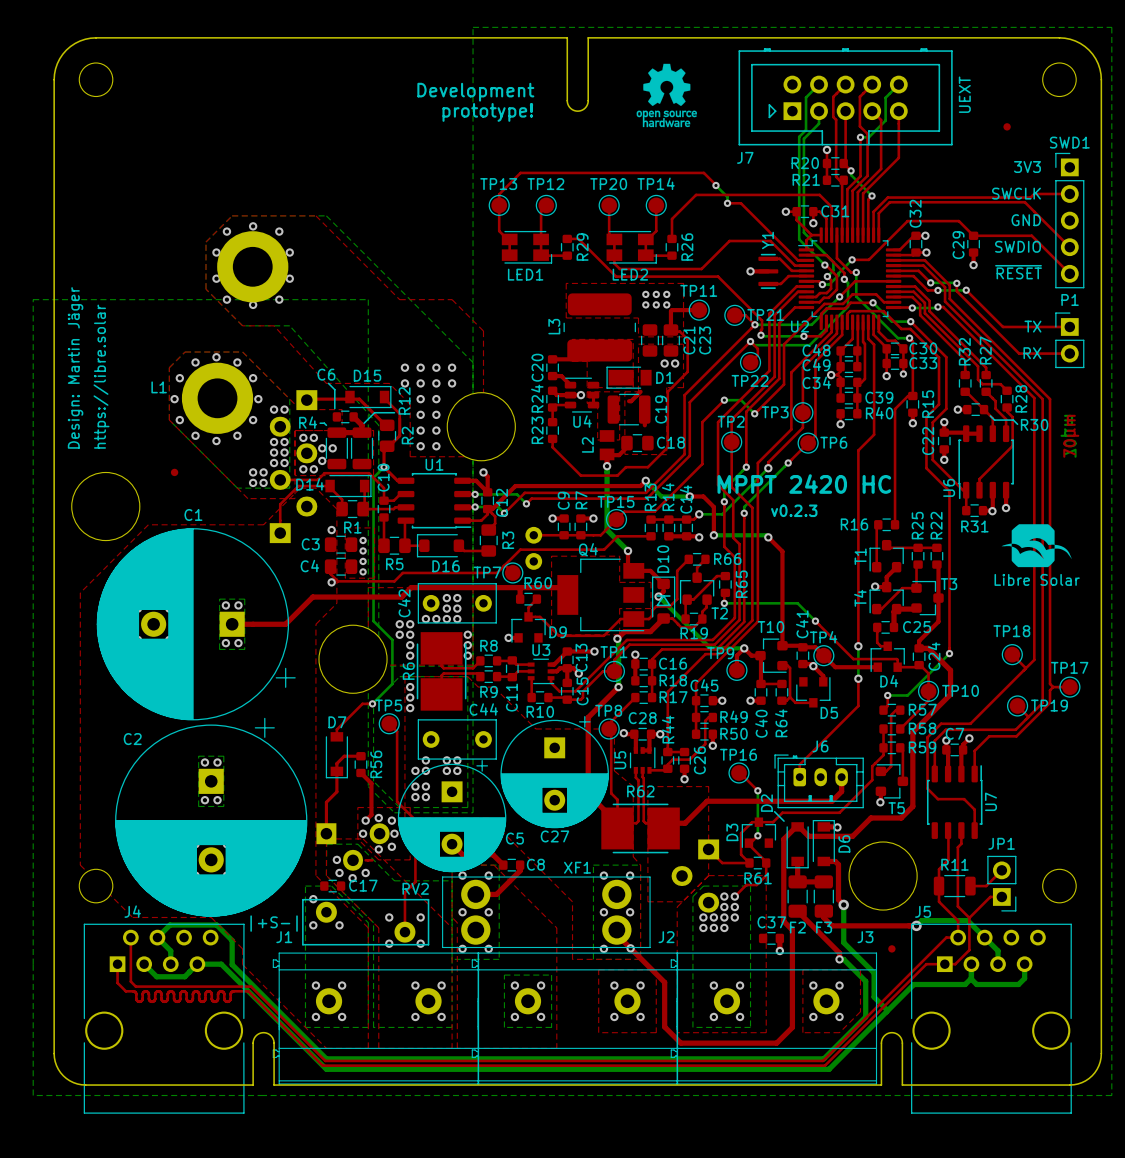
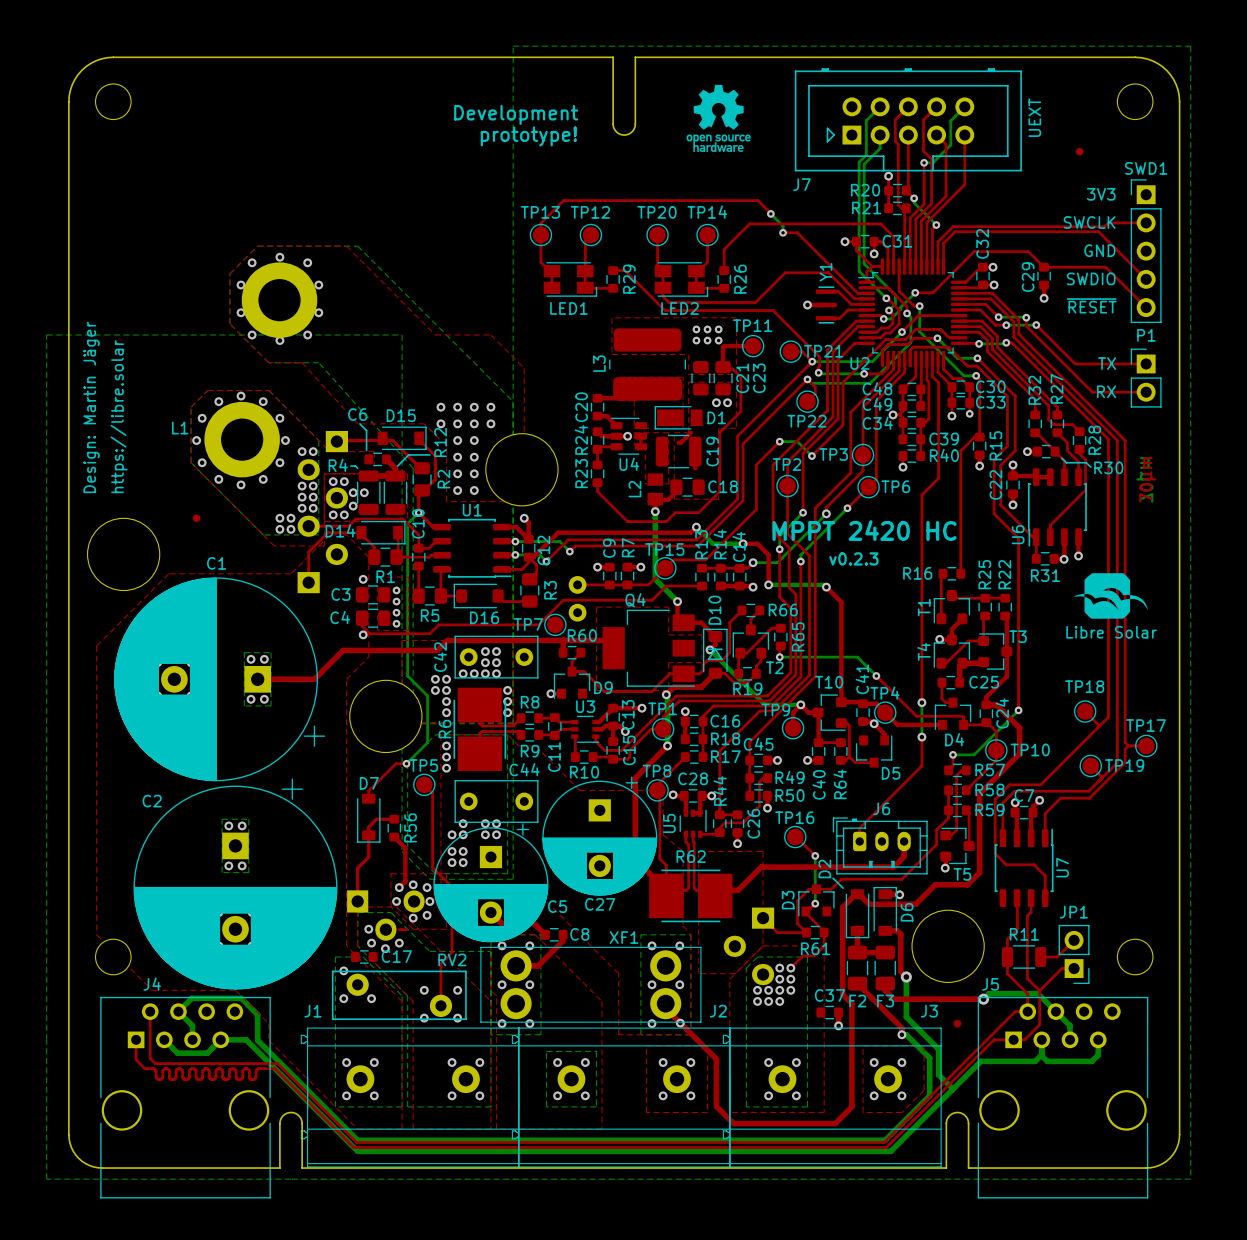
text: |+S-| (274, 923) -> none

